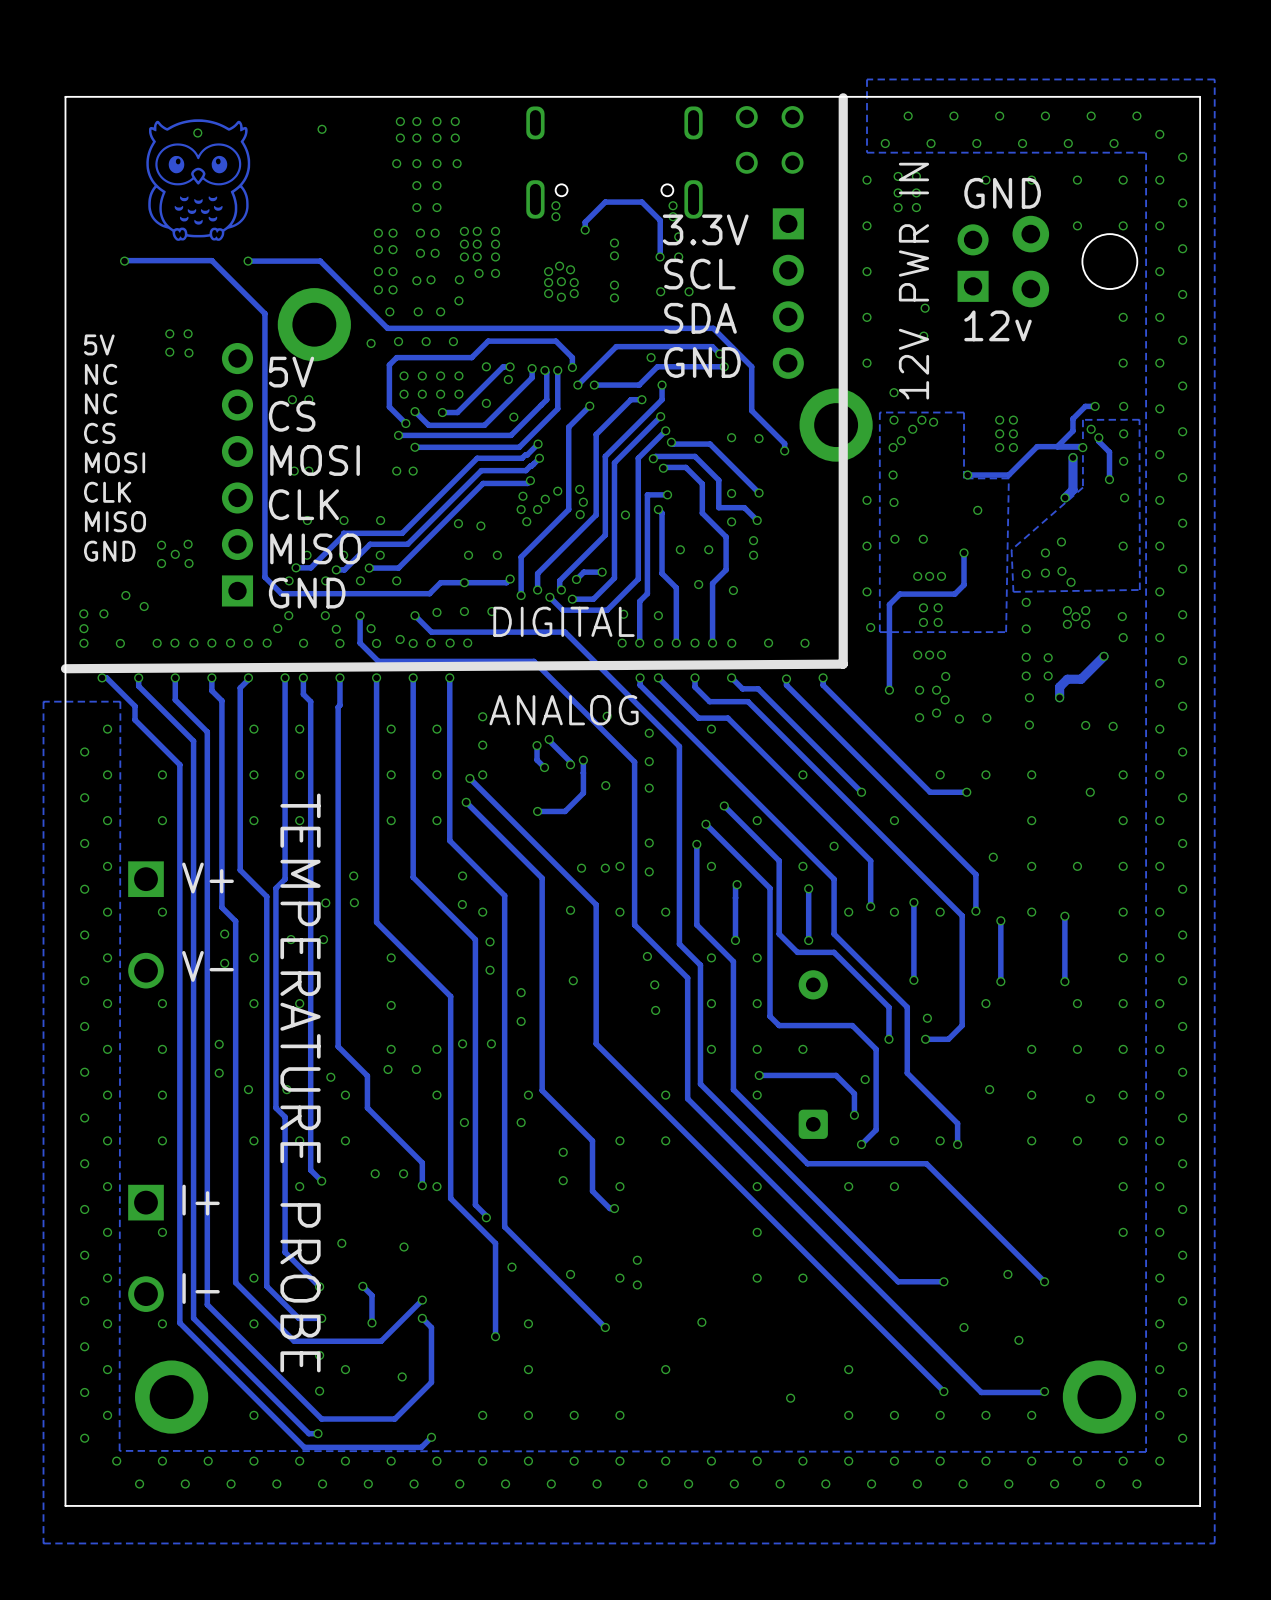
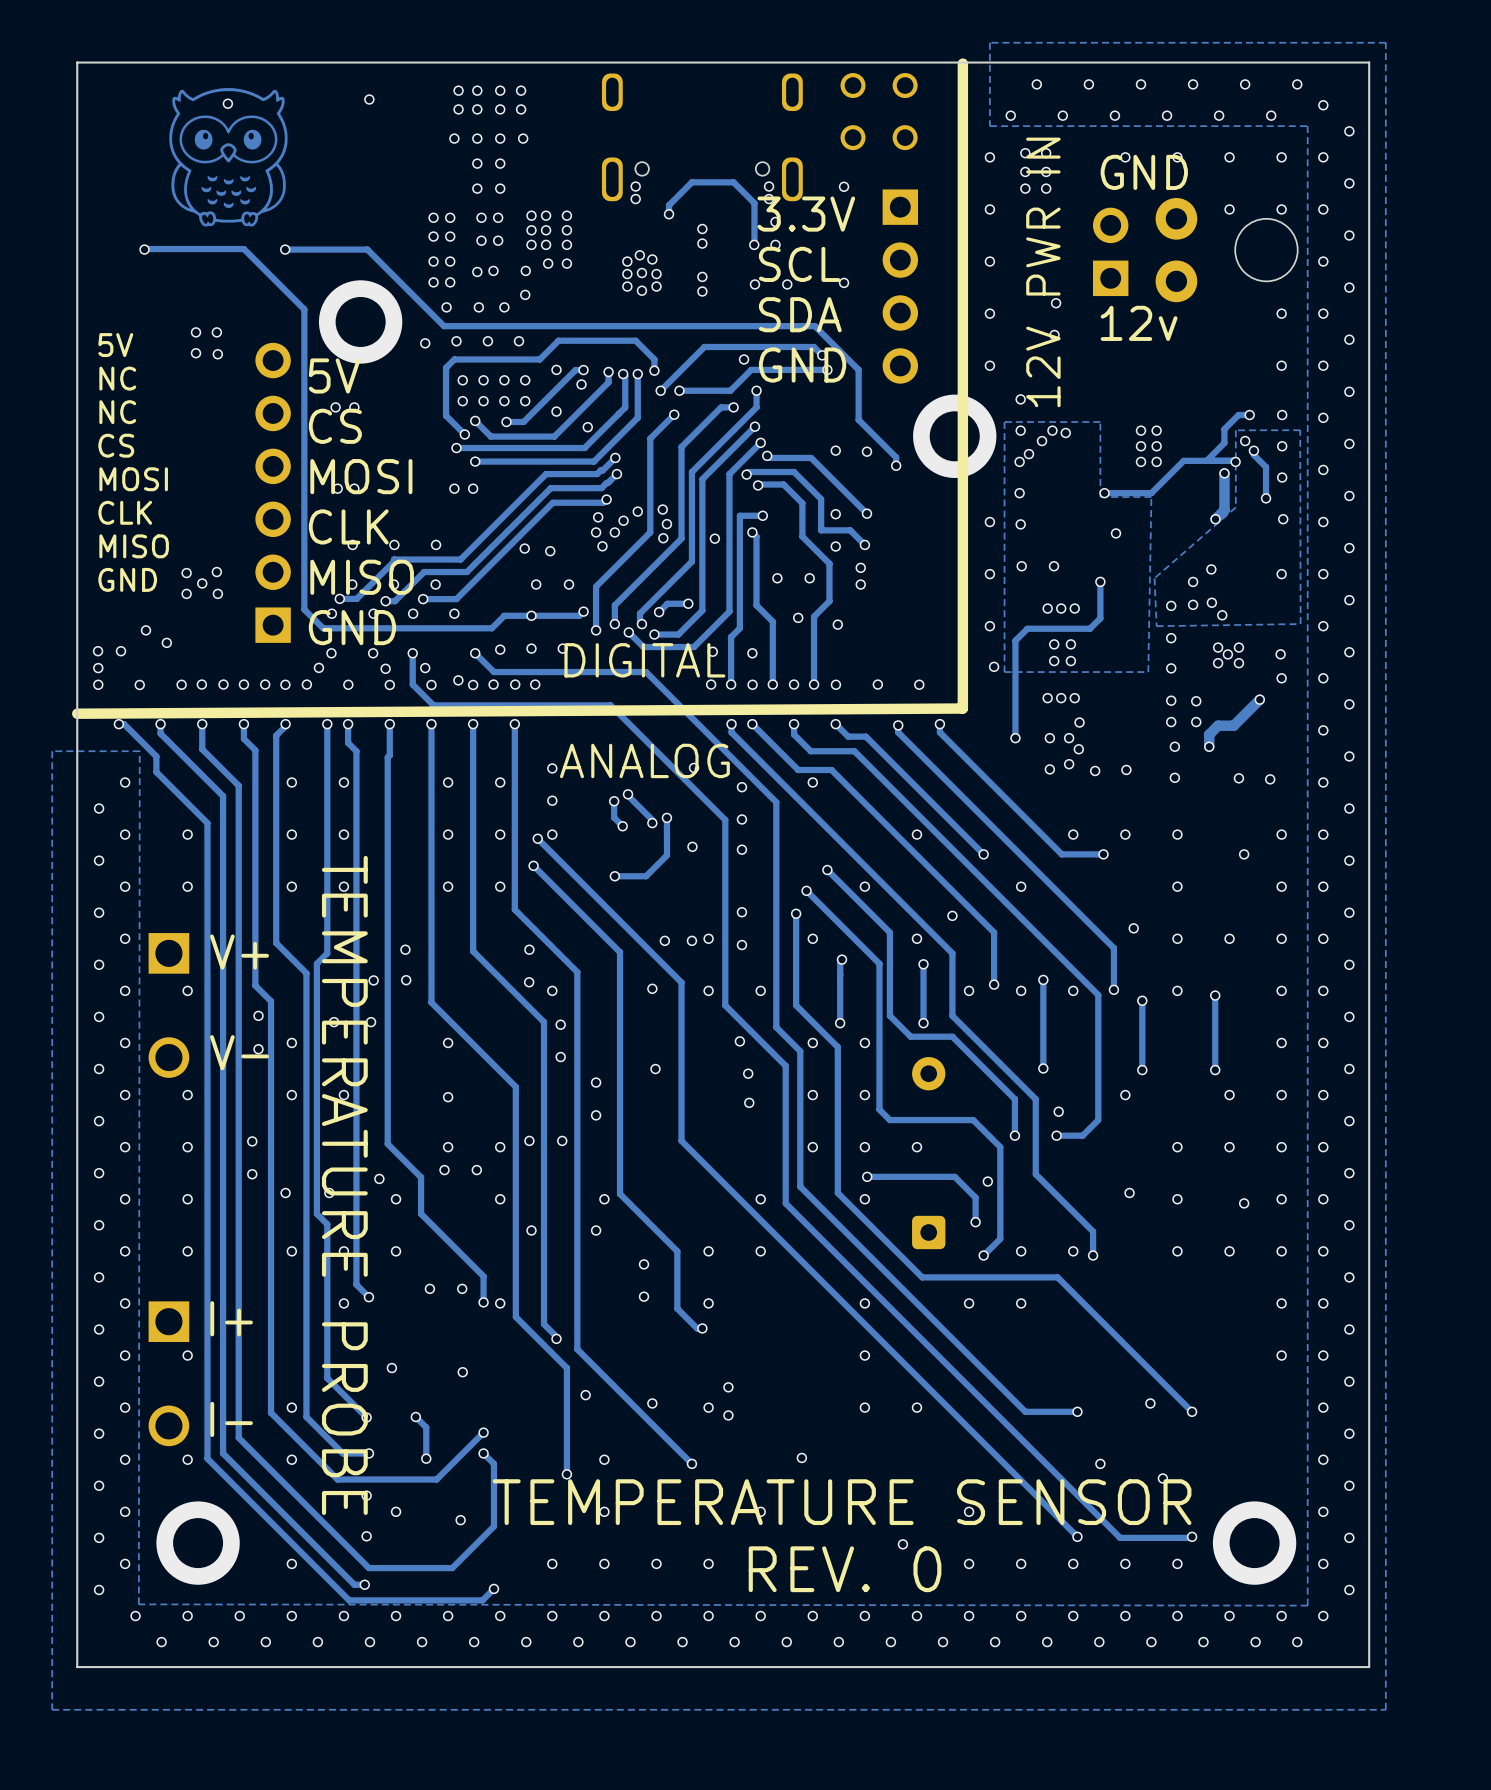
via: none -> (844, 186)
via: none -> (844, 282)
text: none -> TEMPERATURE SENSOR (842, 1502)
text: none -> REV. 0 (845, 1569)

